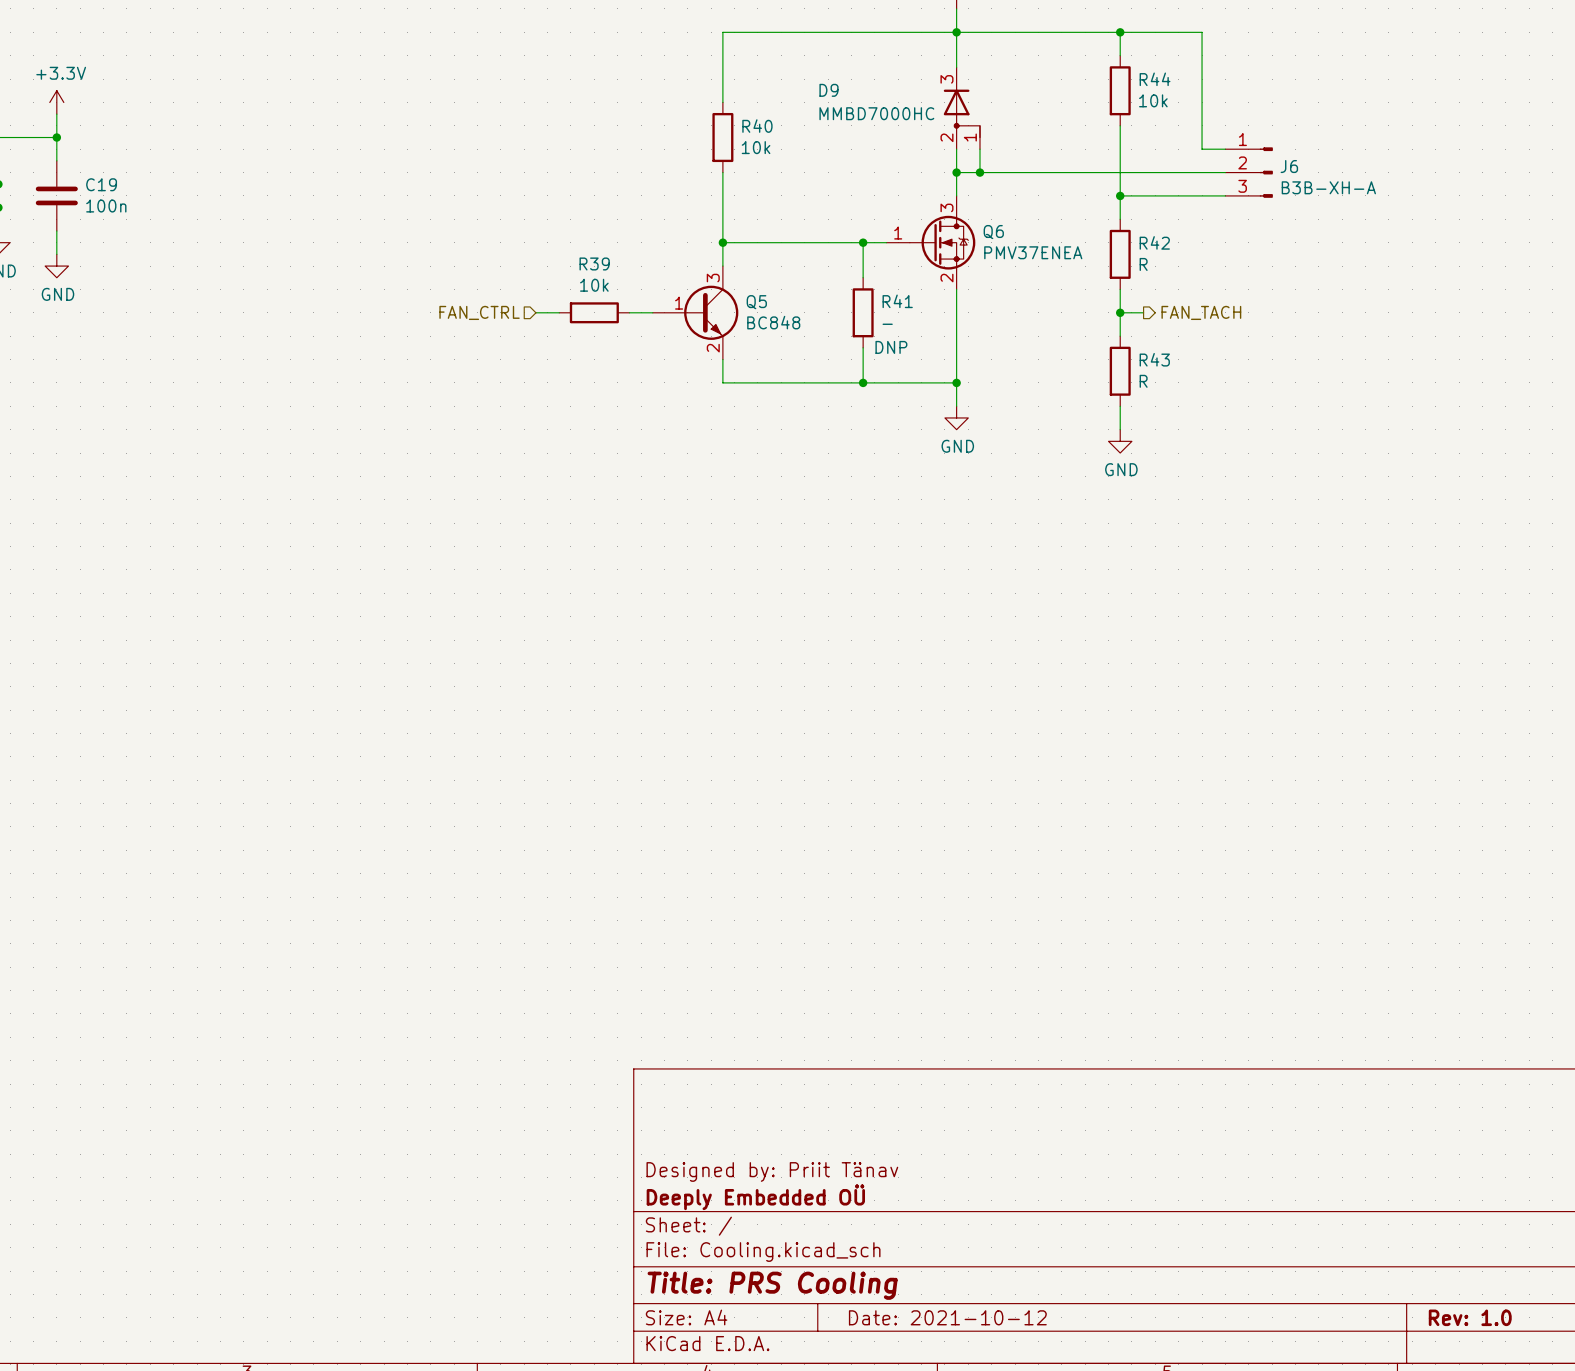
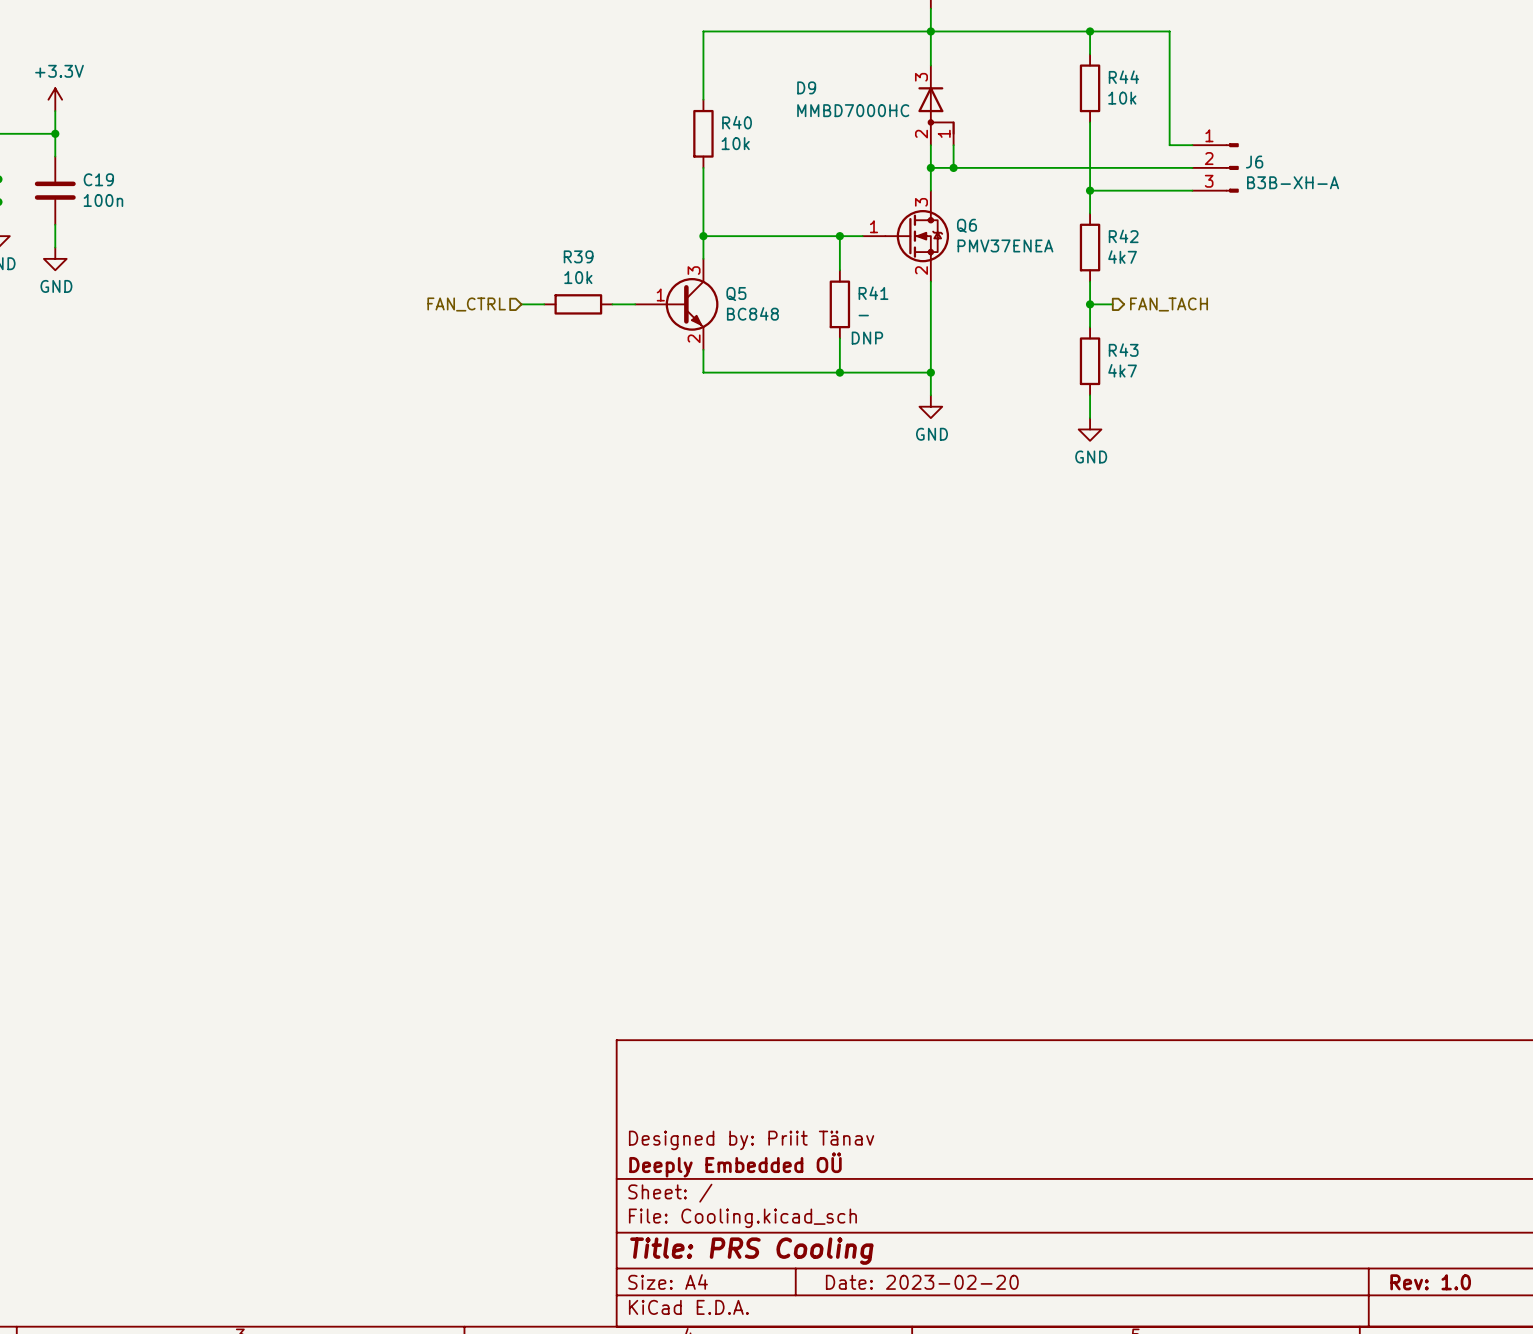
R42 value: R (1143, 264) -> 4k7 (1122, 257)
R43 value: R (1143, 381) -> 4k7 (1122, 370)
title block: Date: 2021-10-12 (947, 1317) -> Date: 2023-02-20 (922, 1282)

